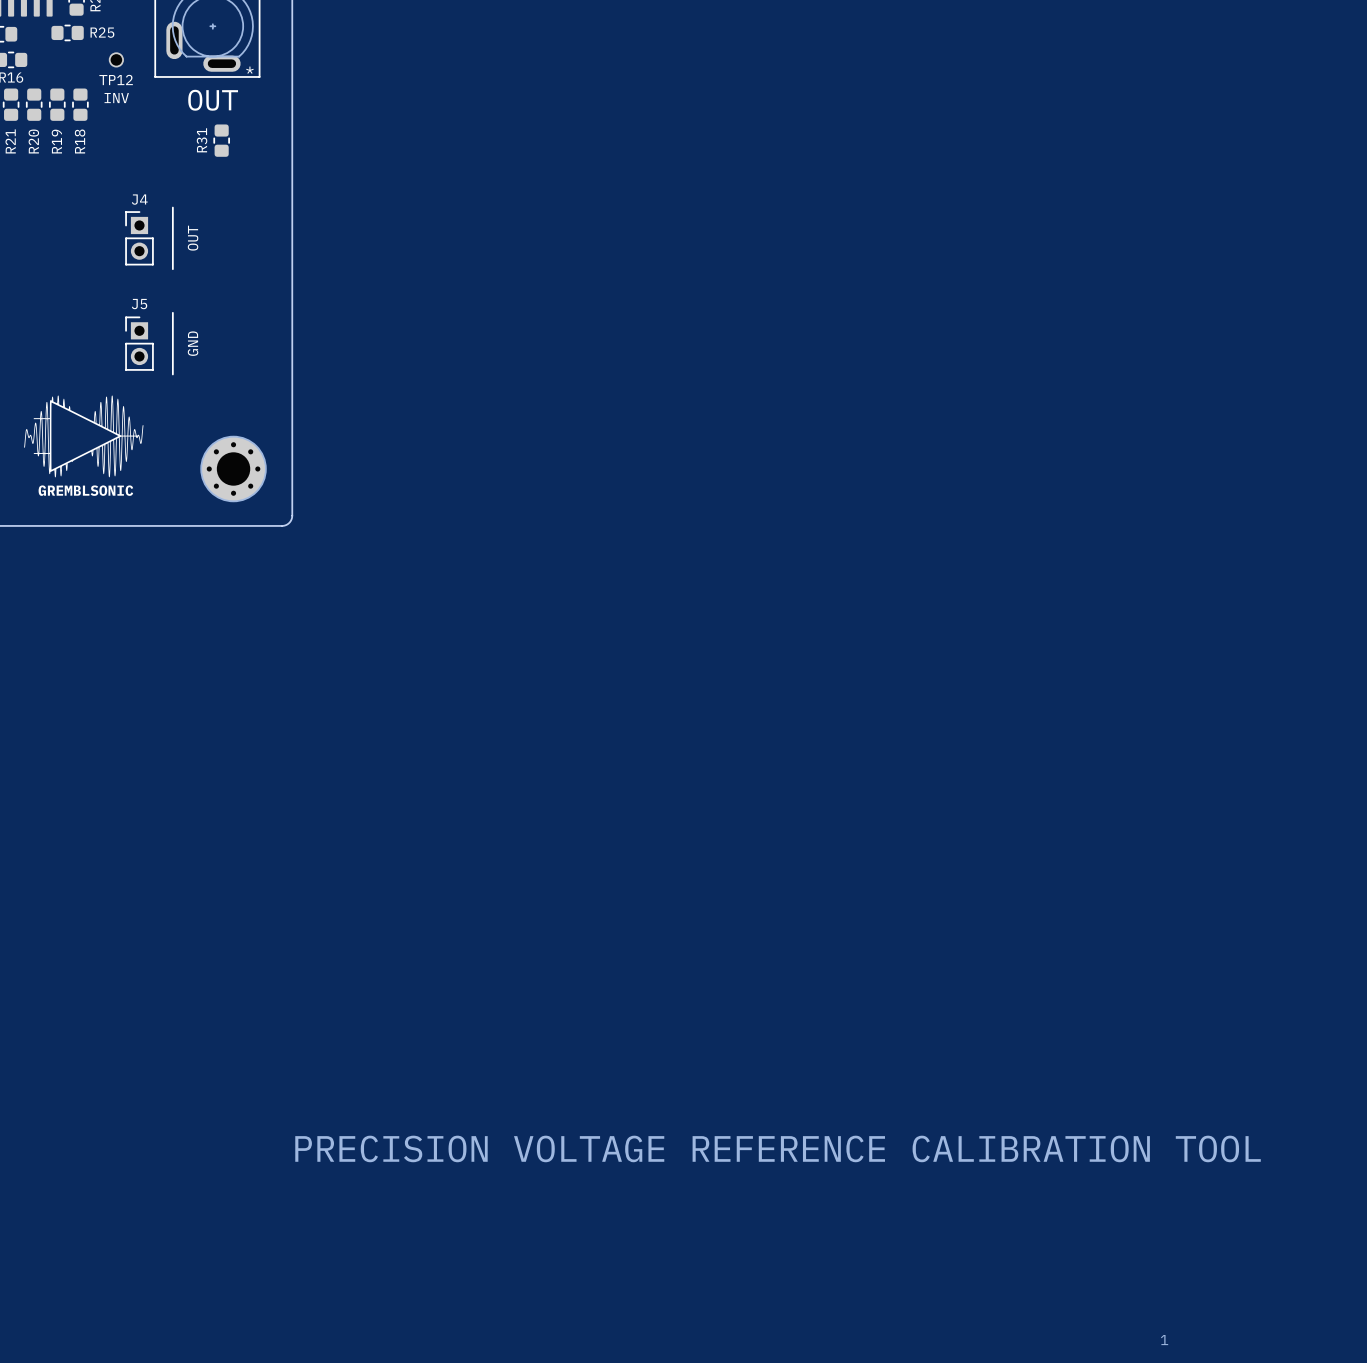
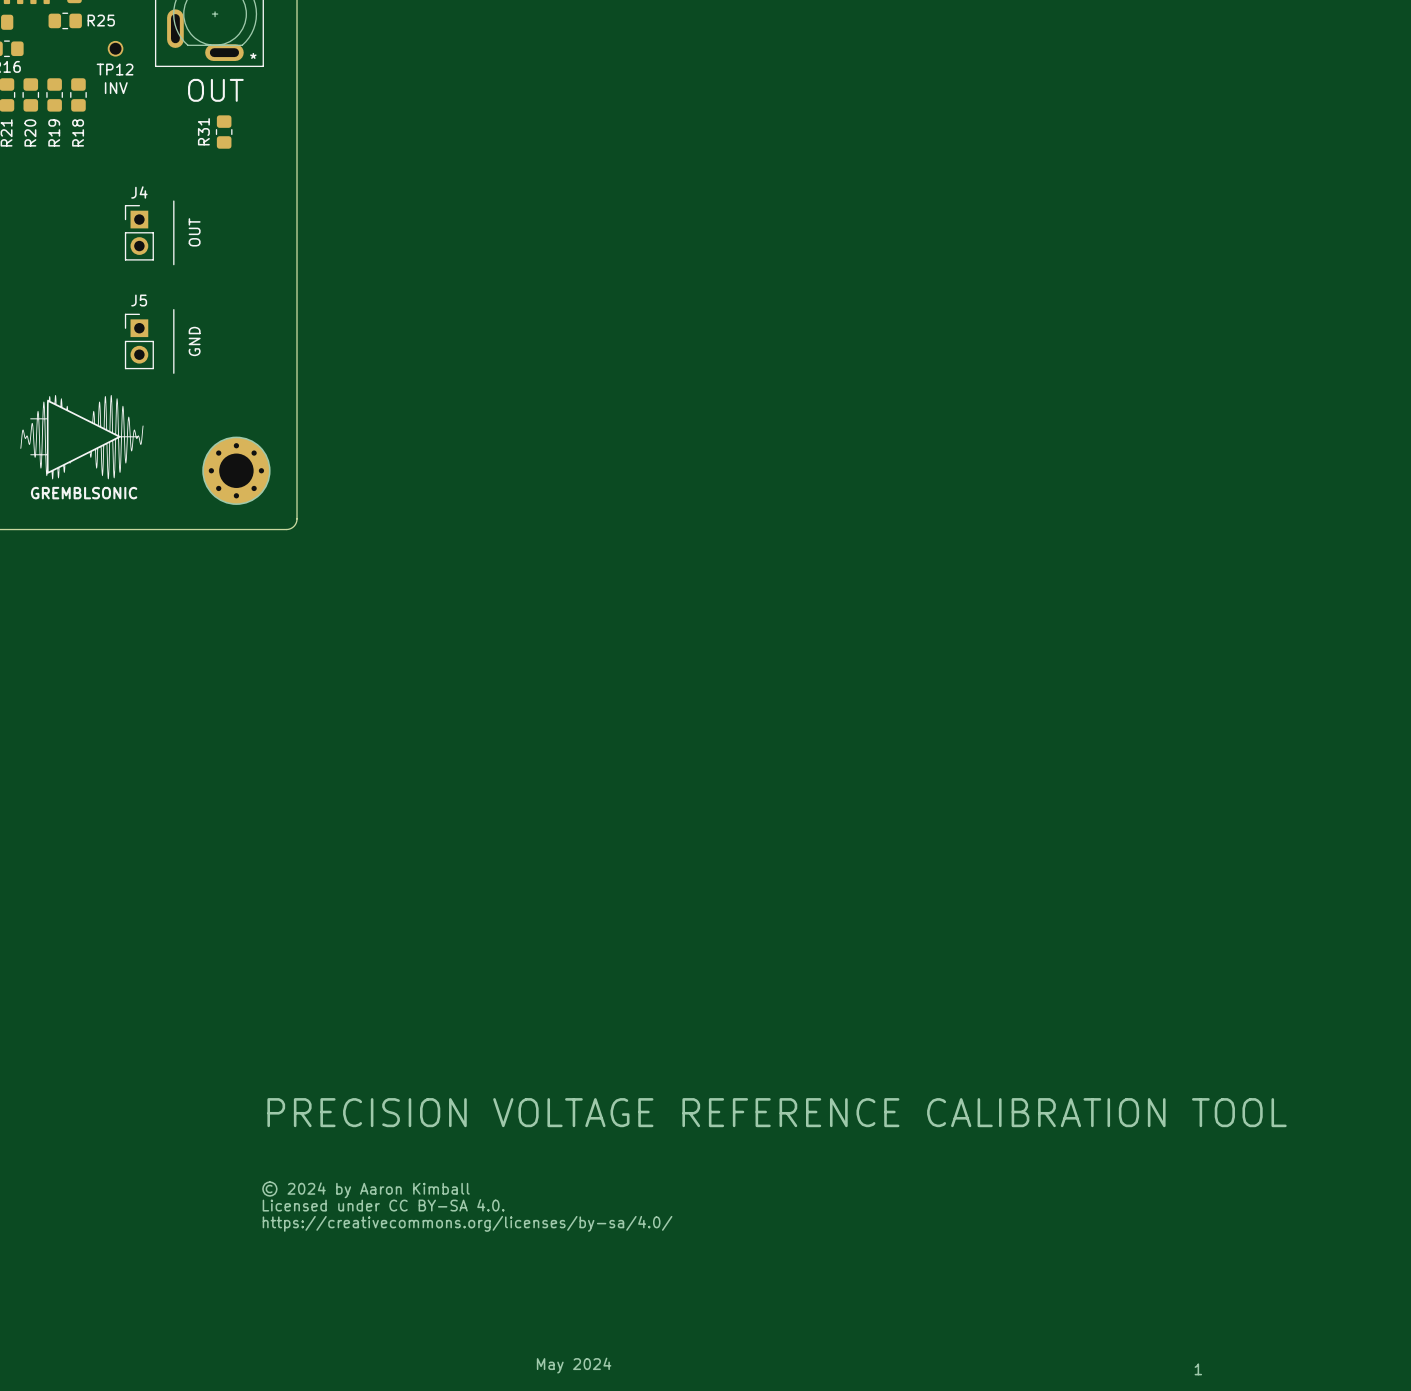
text position: PRECISION VOLTAGE REFERENCE CALIBRATION TOOL (778, 1148) -> PRECISION VOLTAGE REFERENCE CALIBRATION TOOL (777, 1112)
text: none -> © 2024 by Aaron Kimball (365, 1189)
text: none -> Licensed under CC BY-SA 4.0. (383, 1205)
text: none -> https://creativecommons.org/licenses/by-sa/4.0/ (467, 1223)
text: none -> May 2024 (574, 1365)

